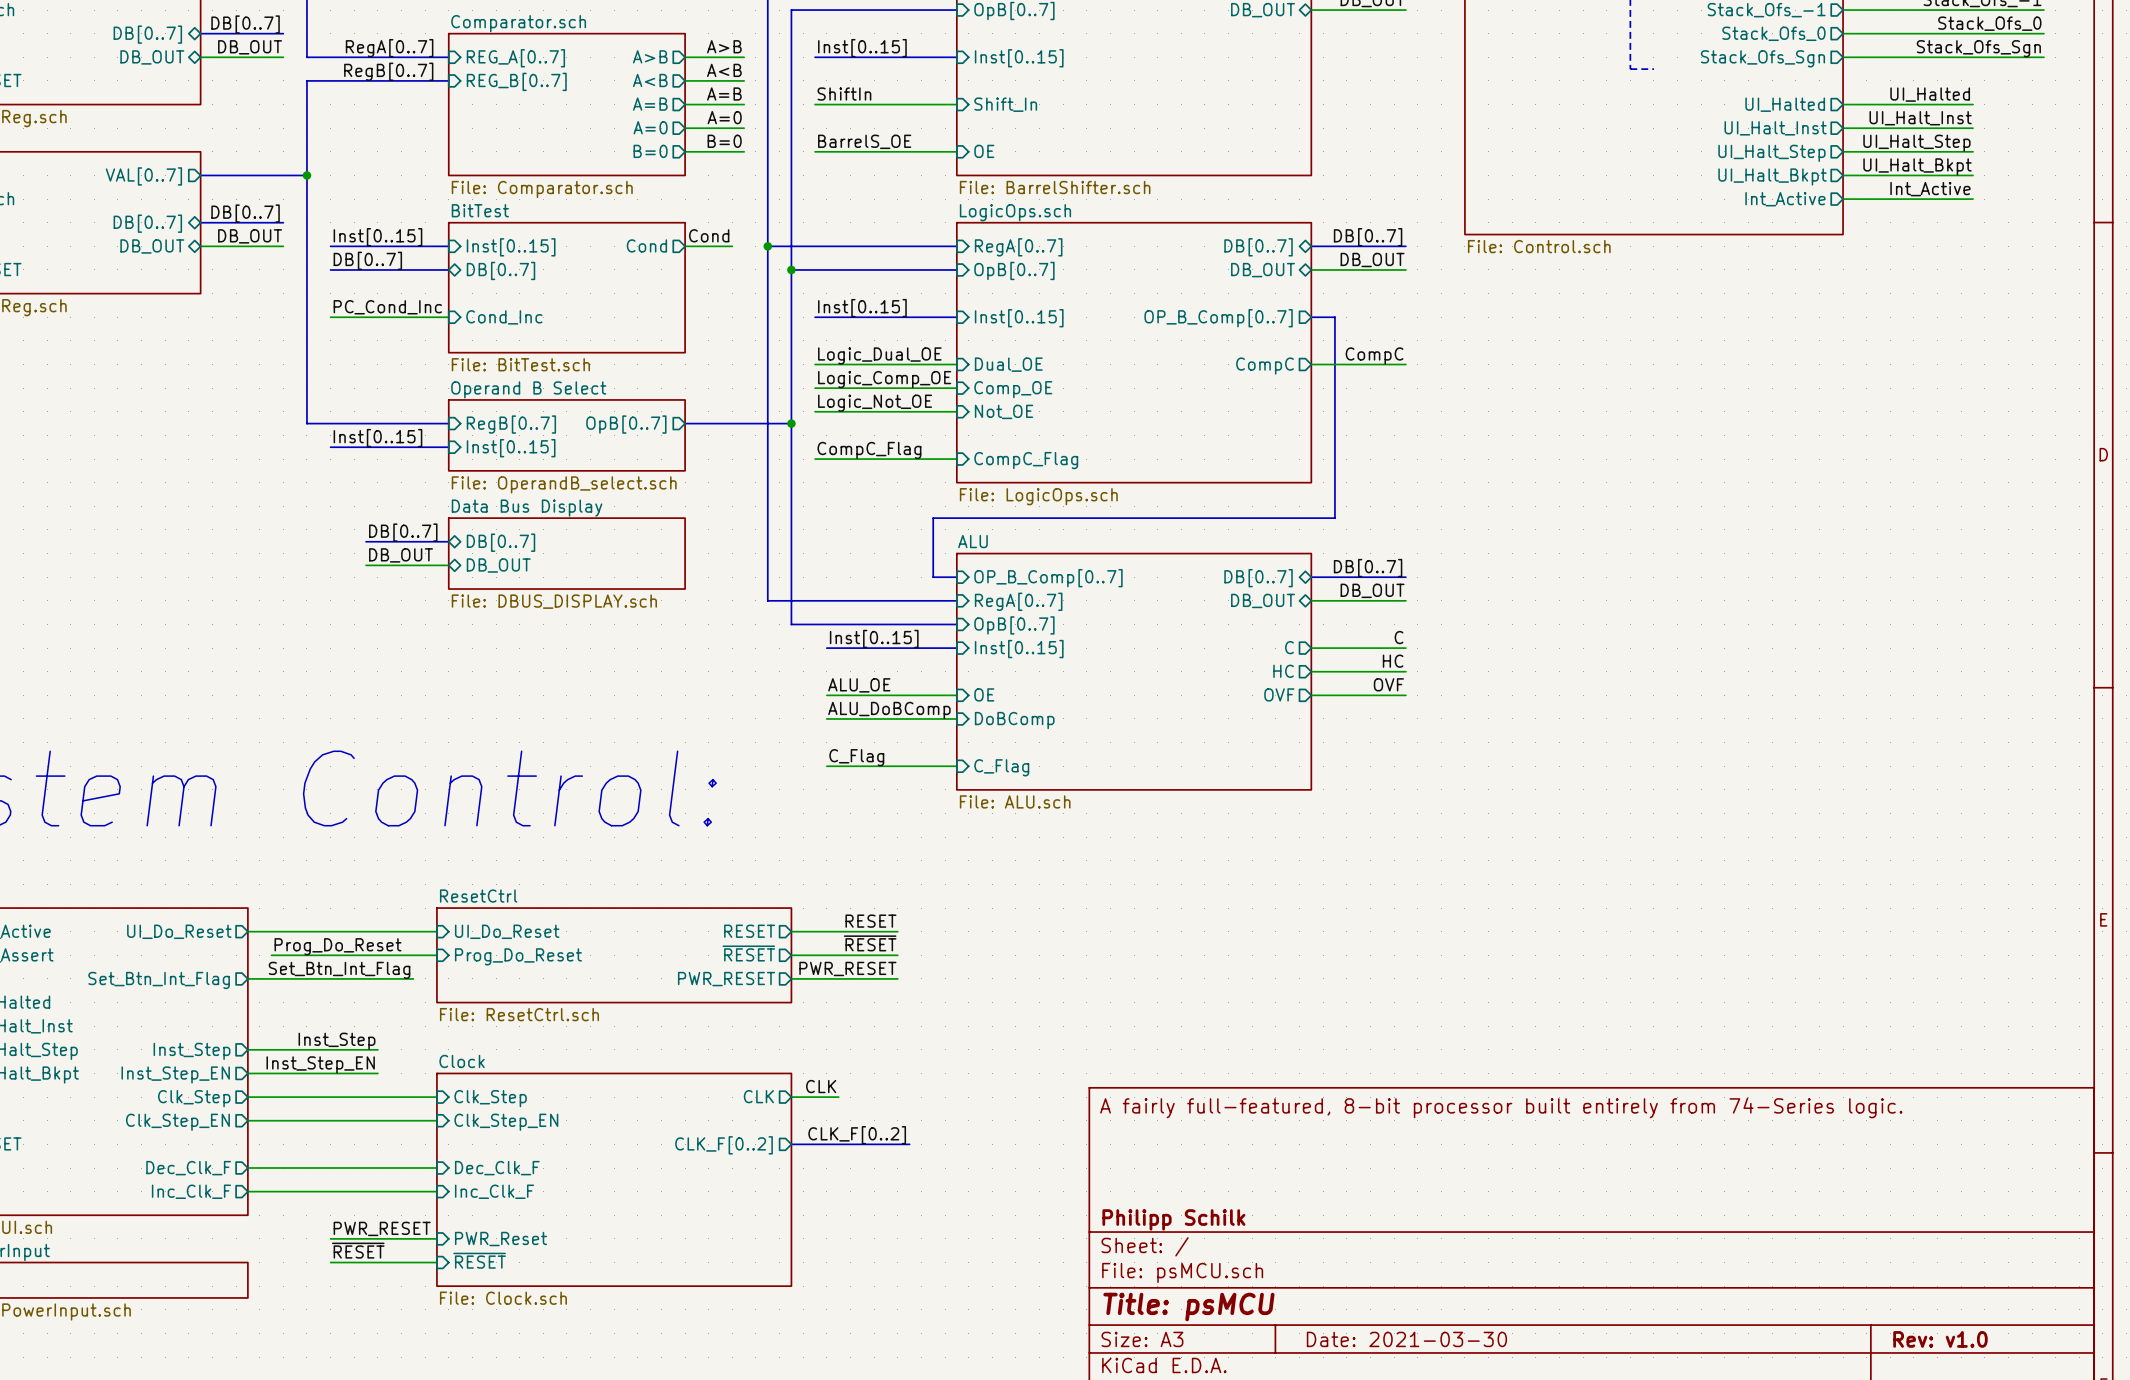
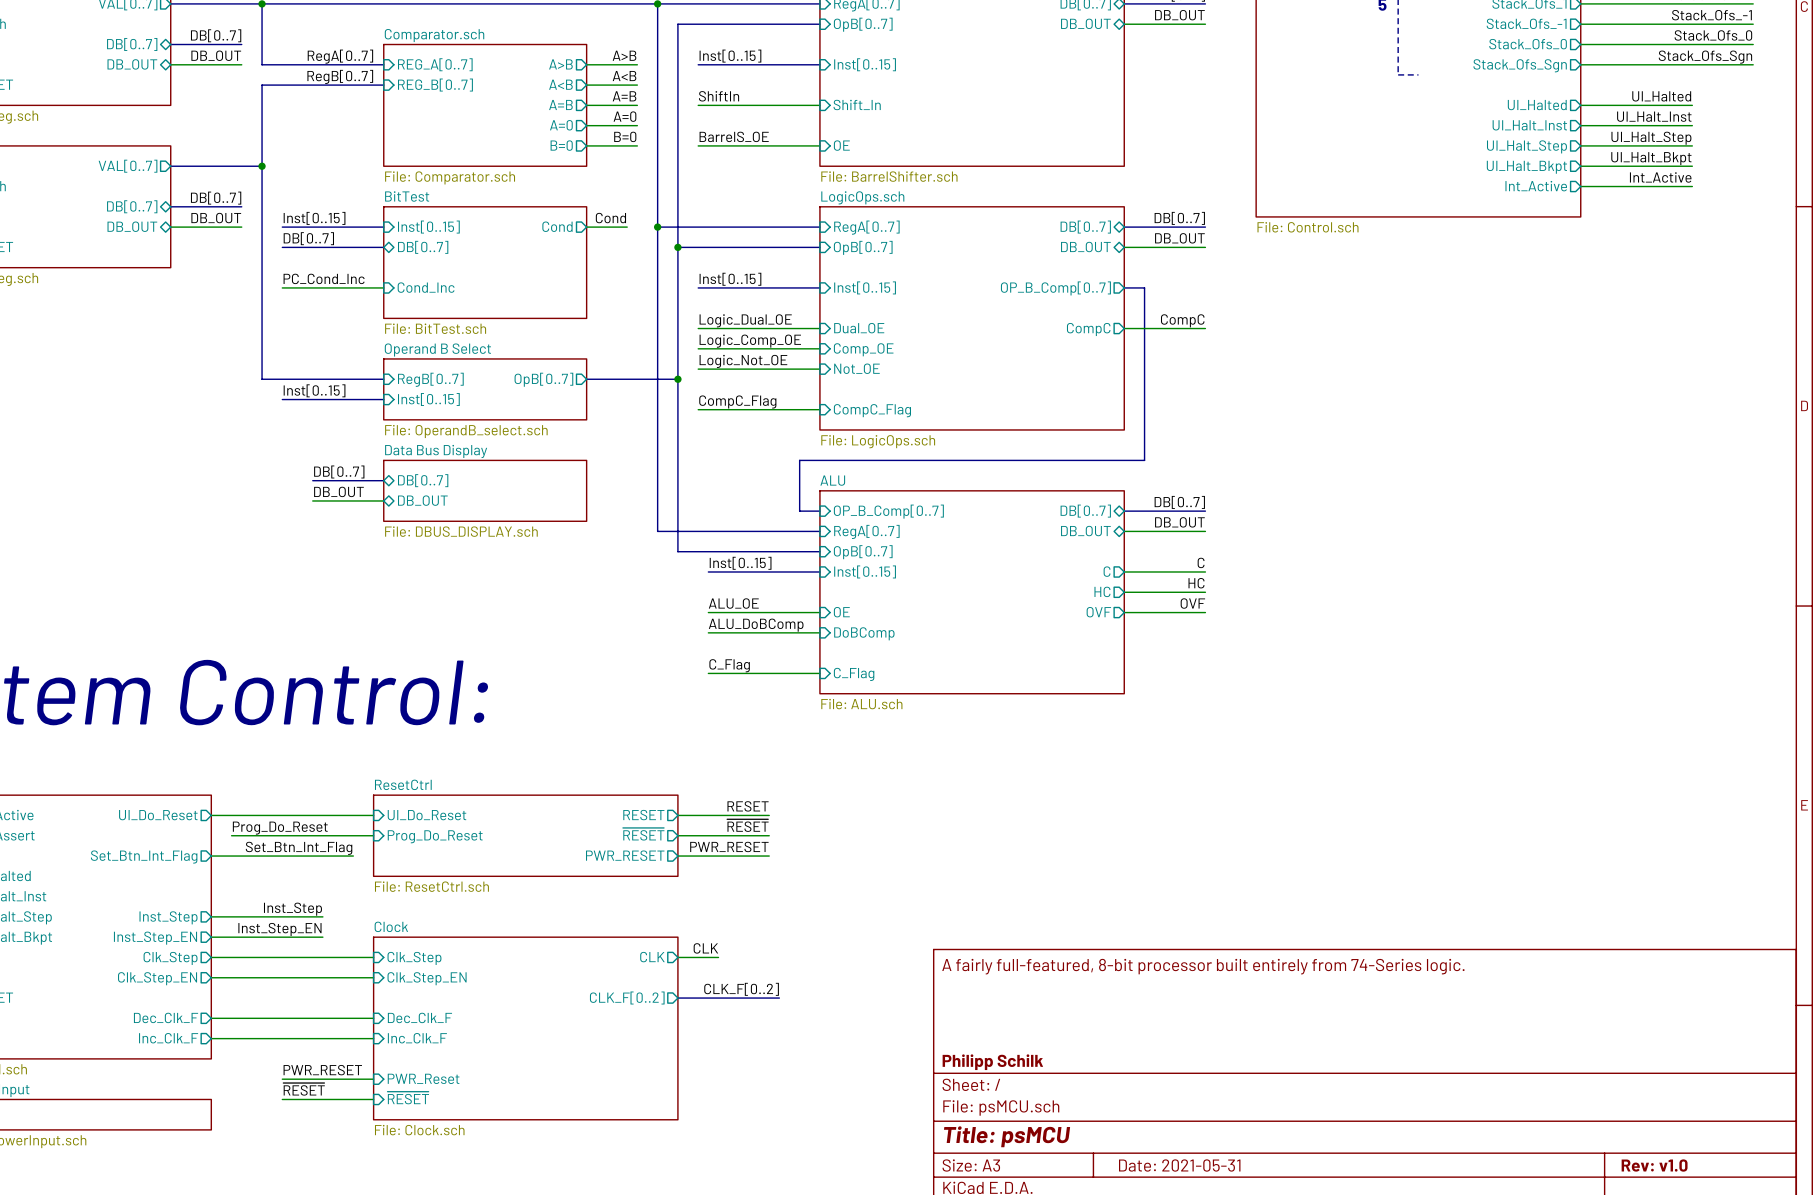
title block: Date: 2021-03-30 (1406, 1339) -> Date: 2021-05-31 (1179, 1165)

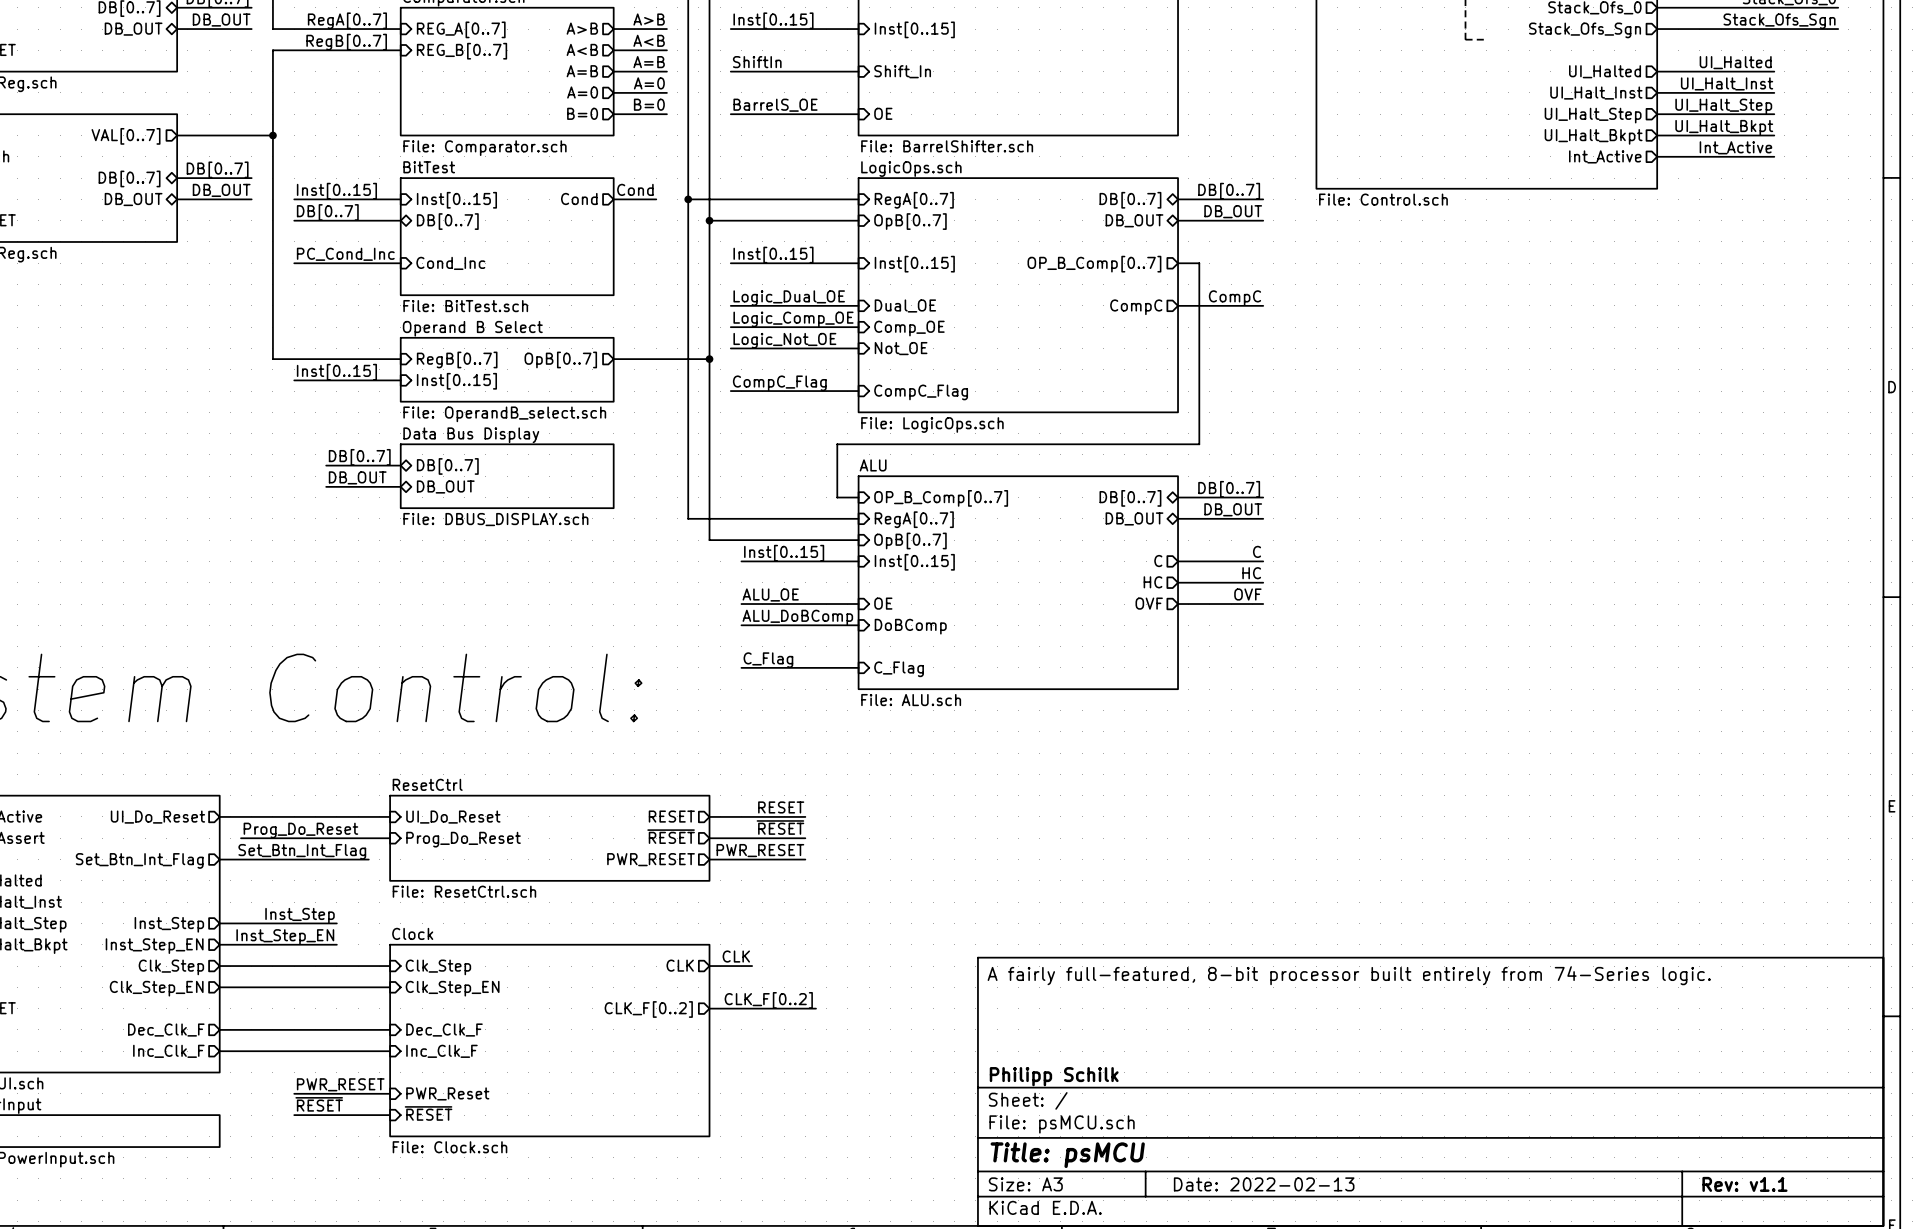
title block: Date: 2021-05-31 (1179, 1165) -> Date: 2022-02-13 (1264, 1184)
title block: Rev: v1.0 (1654, 1165) -> Rev: v1.1 (1744, 1184)

